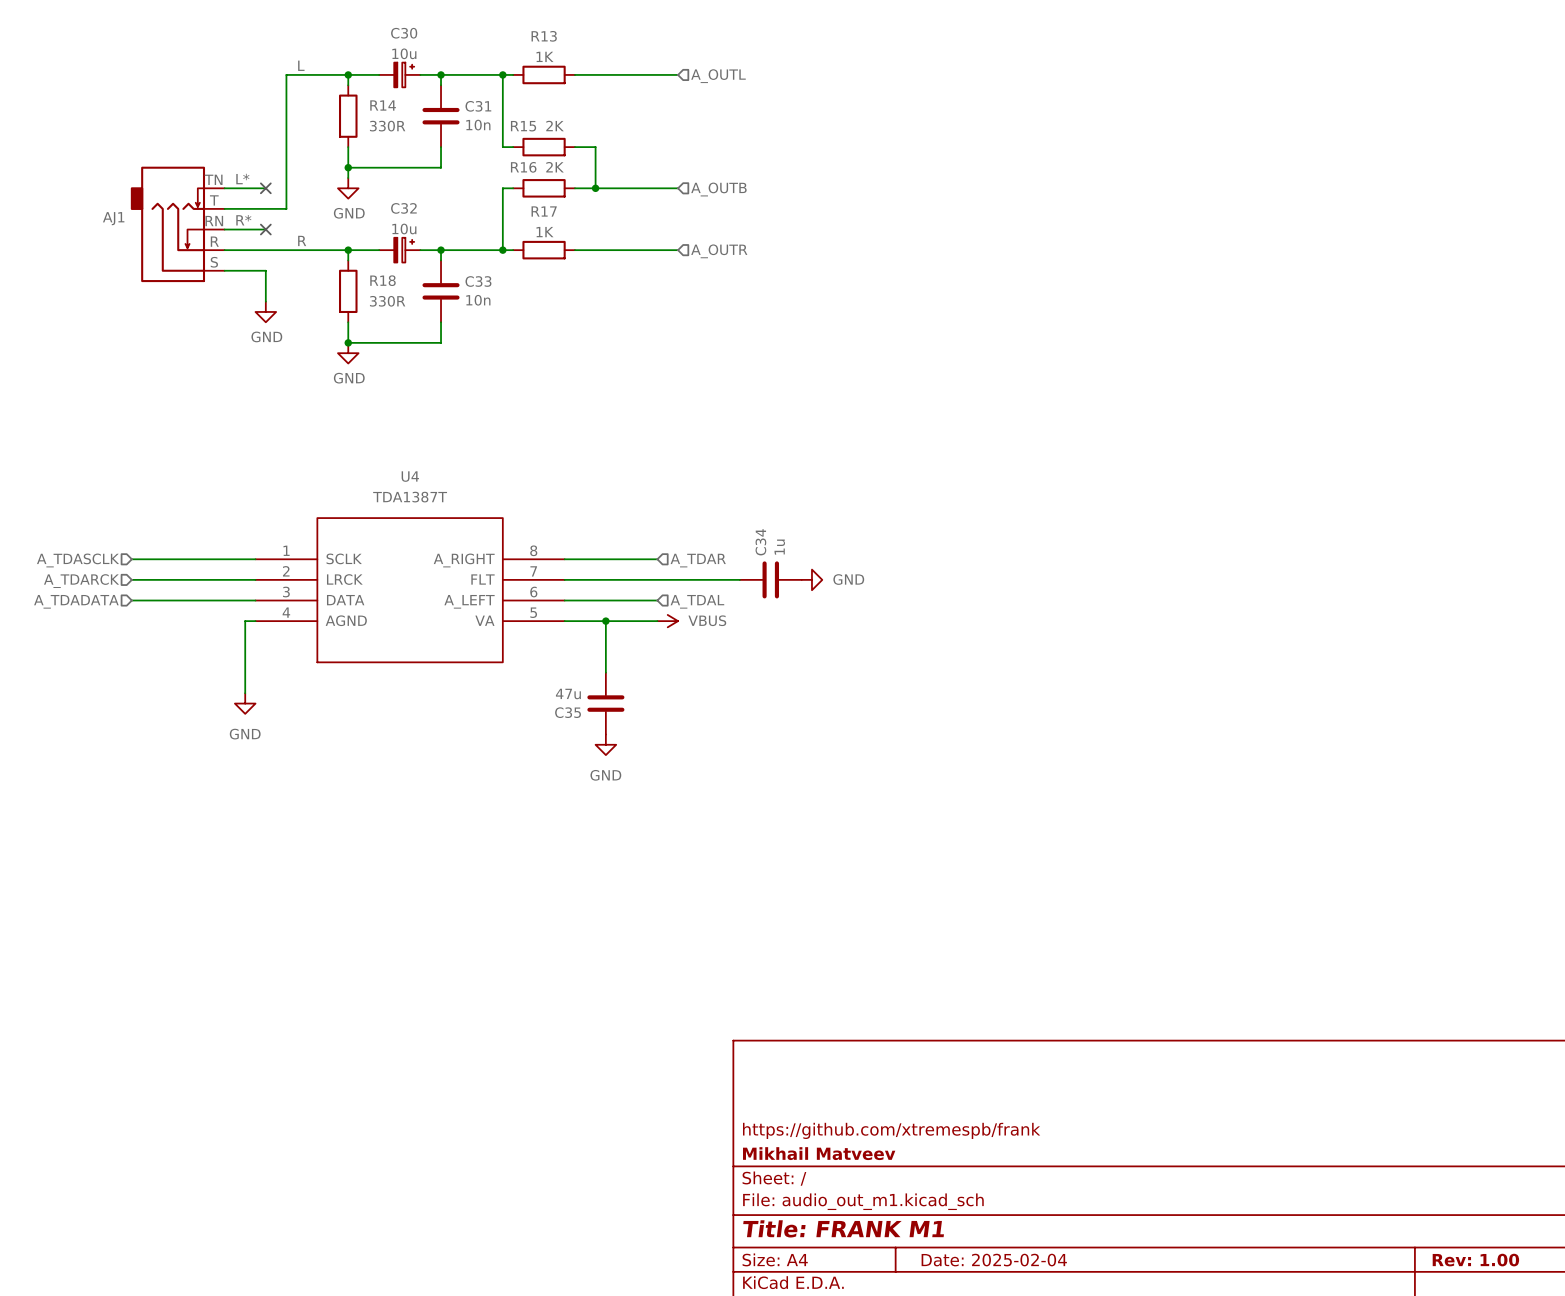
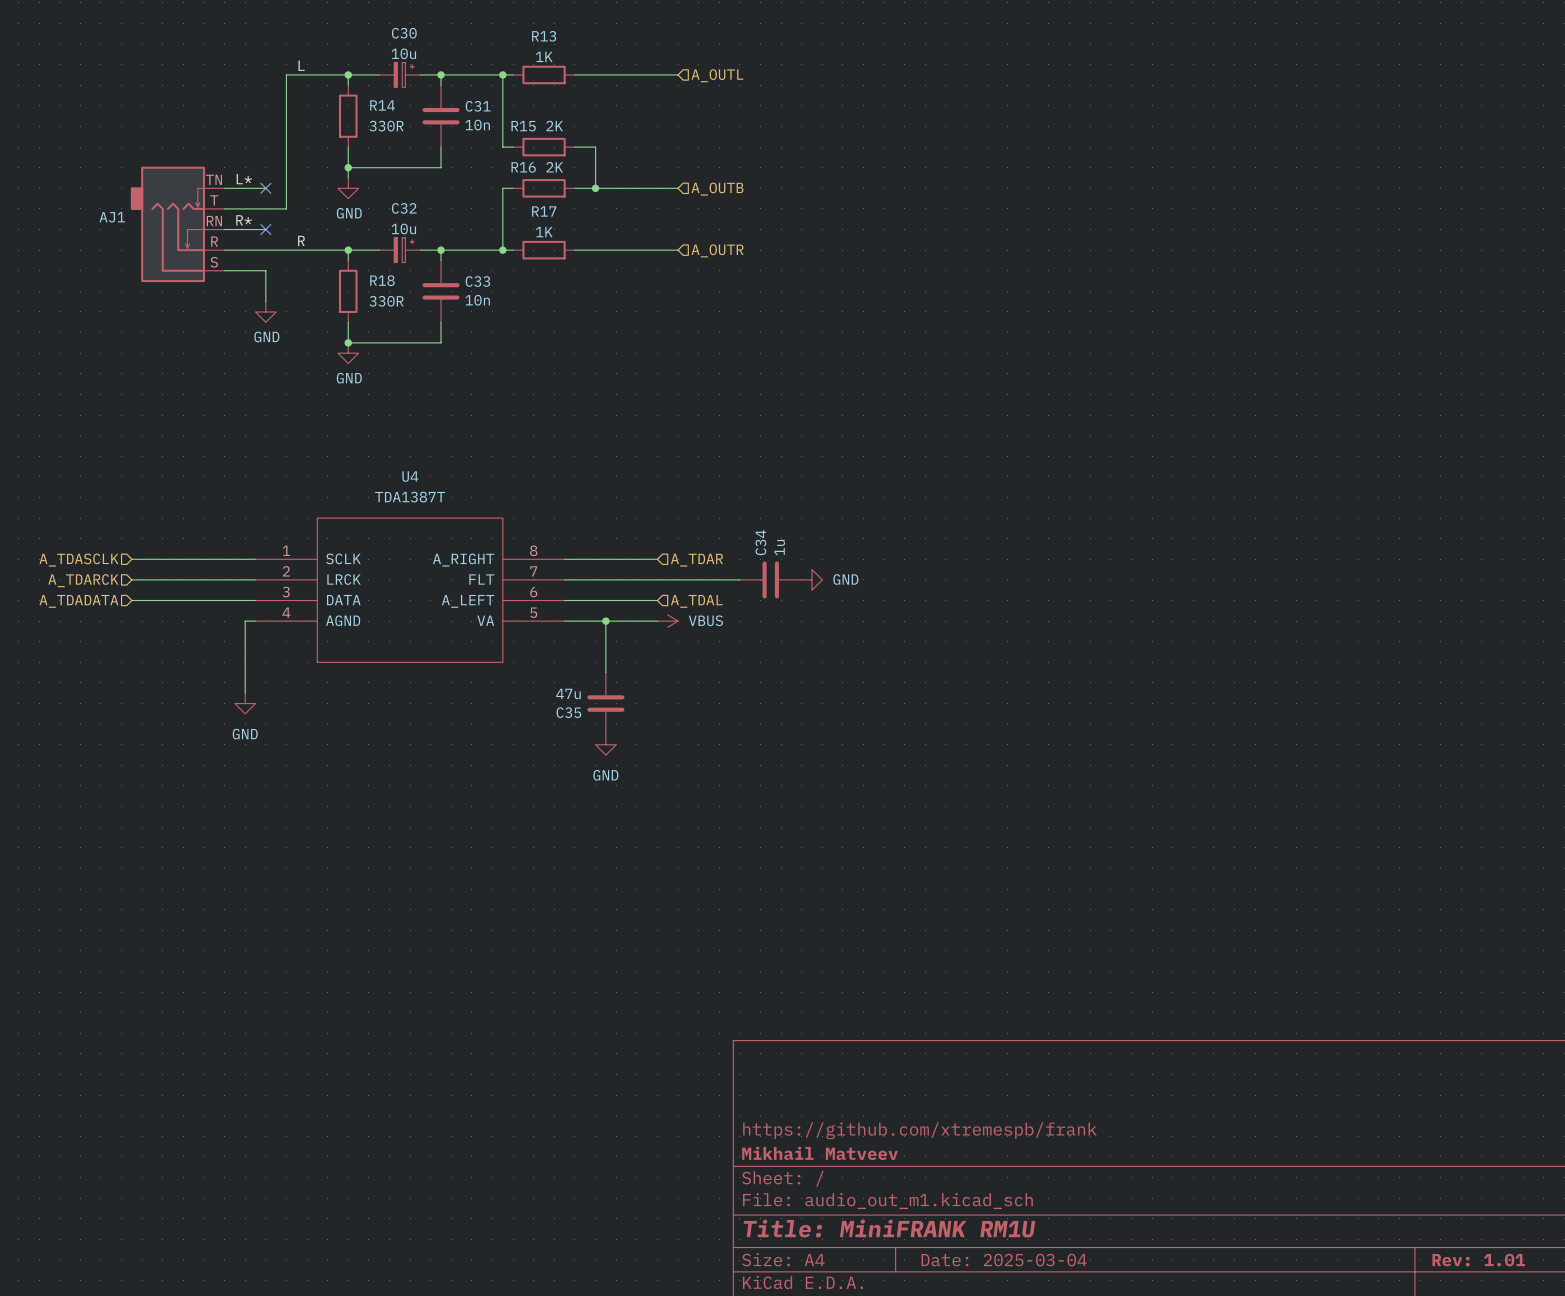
title block: Title: FRANK M1 (843, 1228) -> Title: MiniFRANK RM1U (889, 1228)
title block: Date: 2025-02-04 (994, 1260) -> Date: 2025-03-04 (1004, 1260)
title block: Rev: 1.00 (1475, 1260) -> Rev: 1.01 (1478, 1260)

